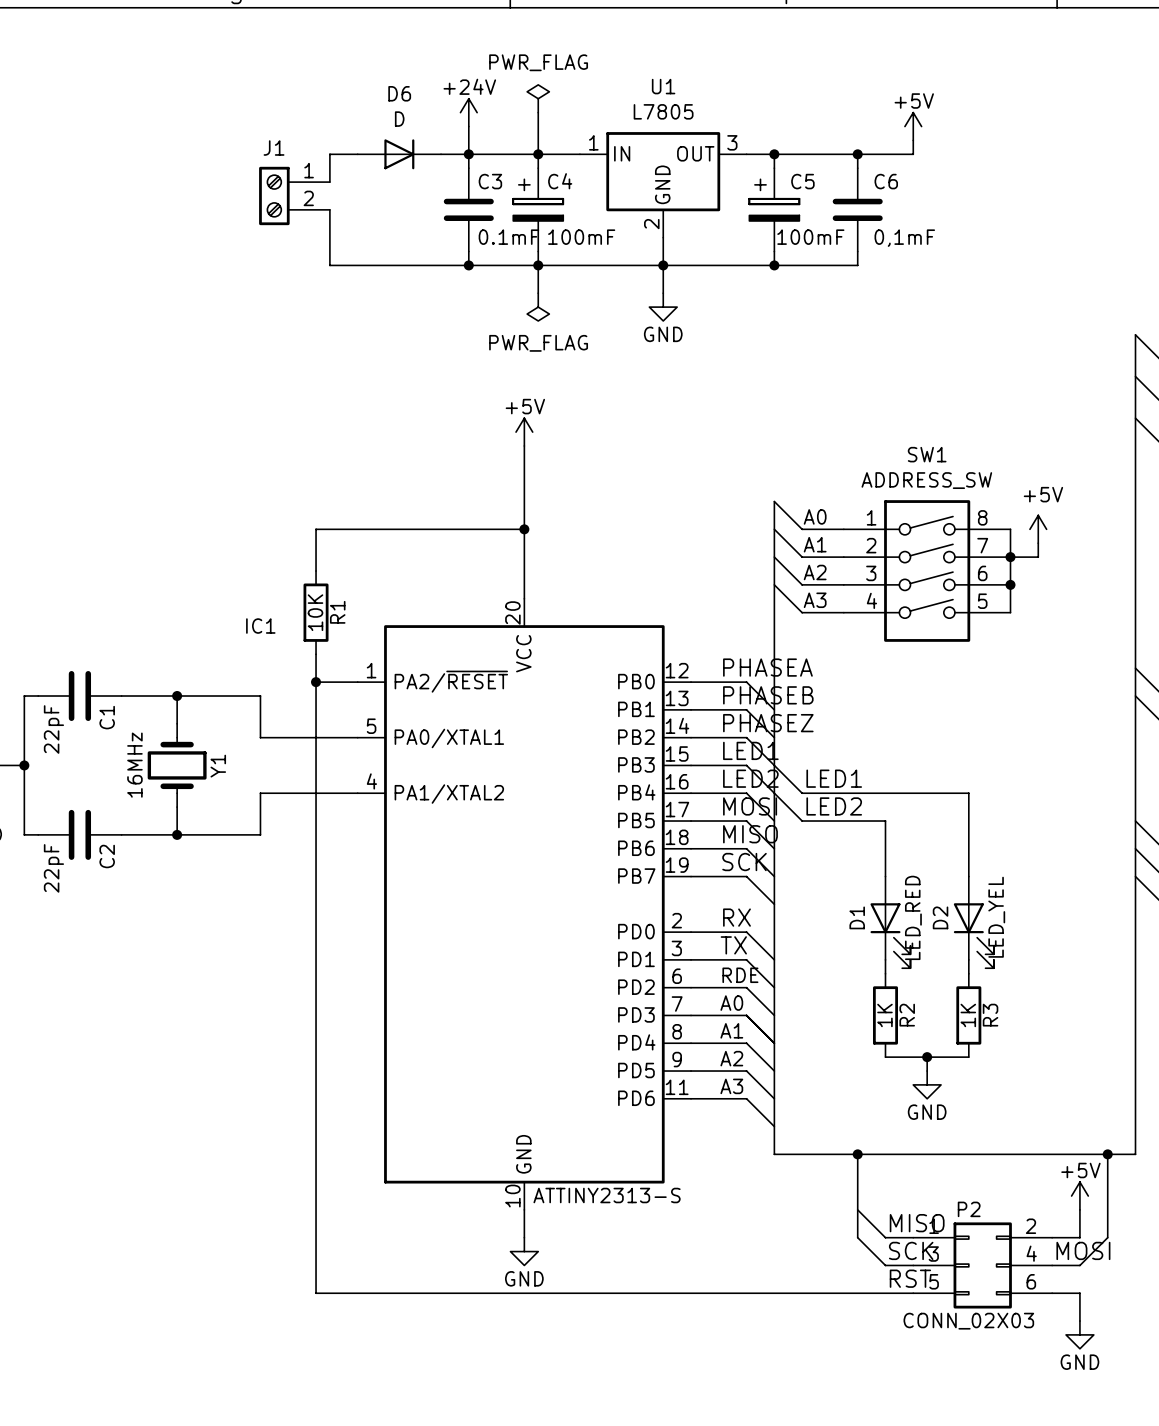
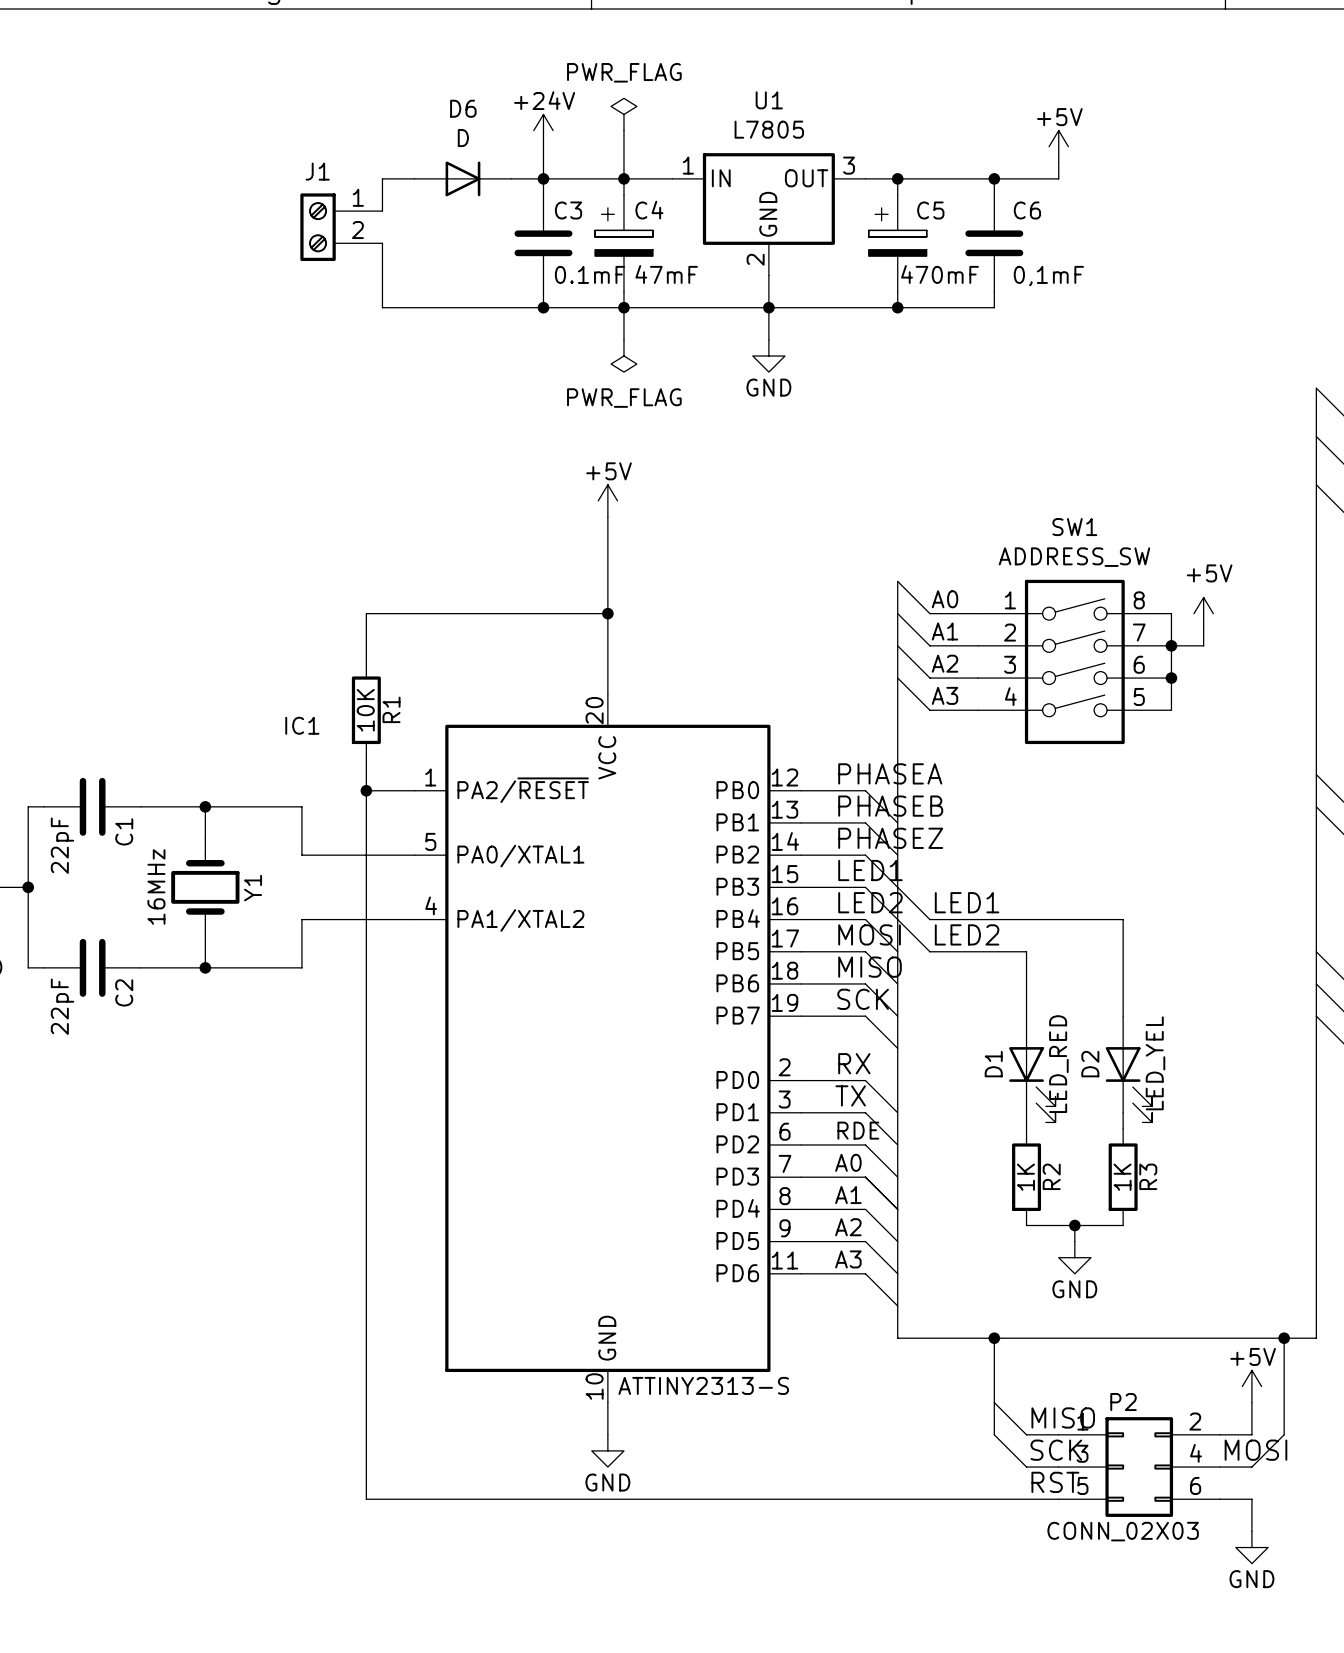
C4 value: 100mF (581, 237) -> 47mF (666, 274)
C5 value: 100mF (810, 237) -> 470mF (940, 274)

